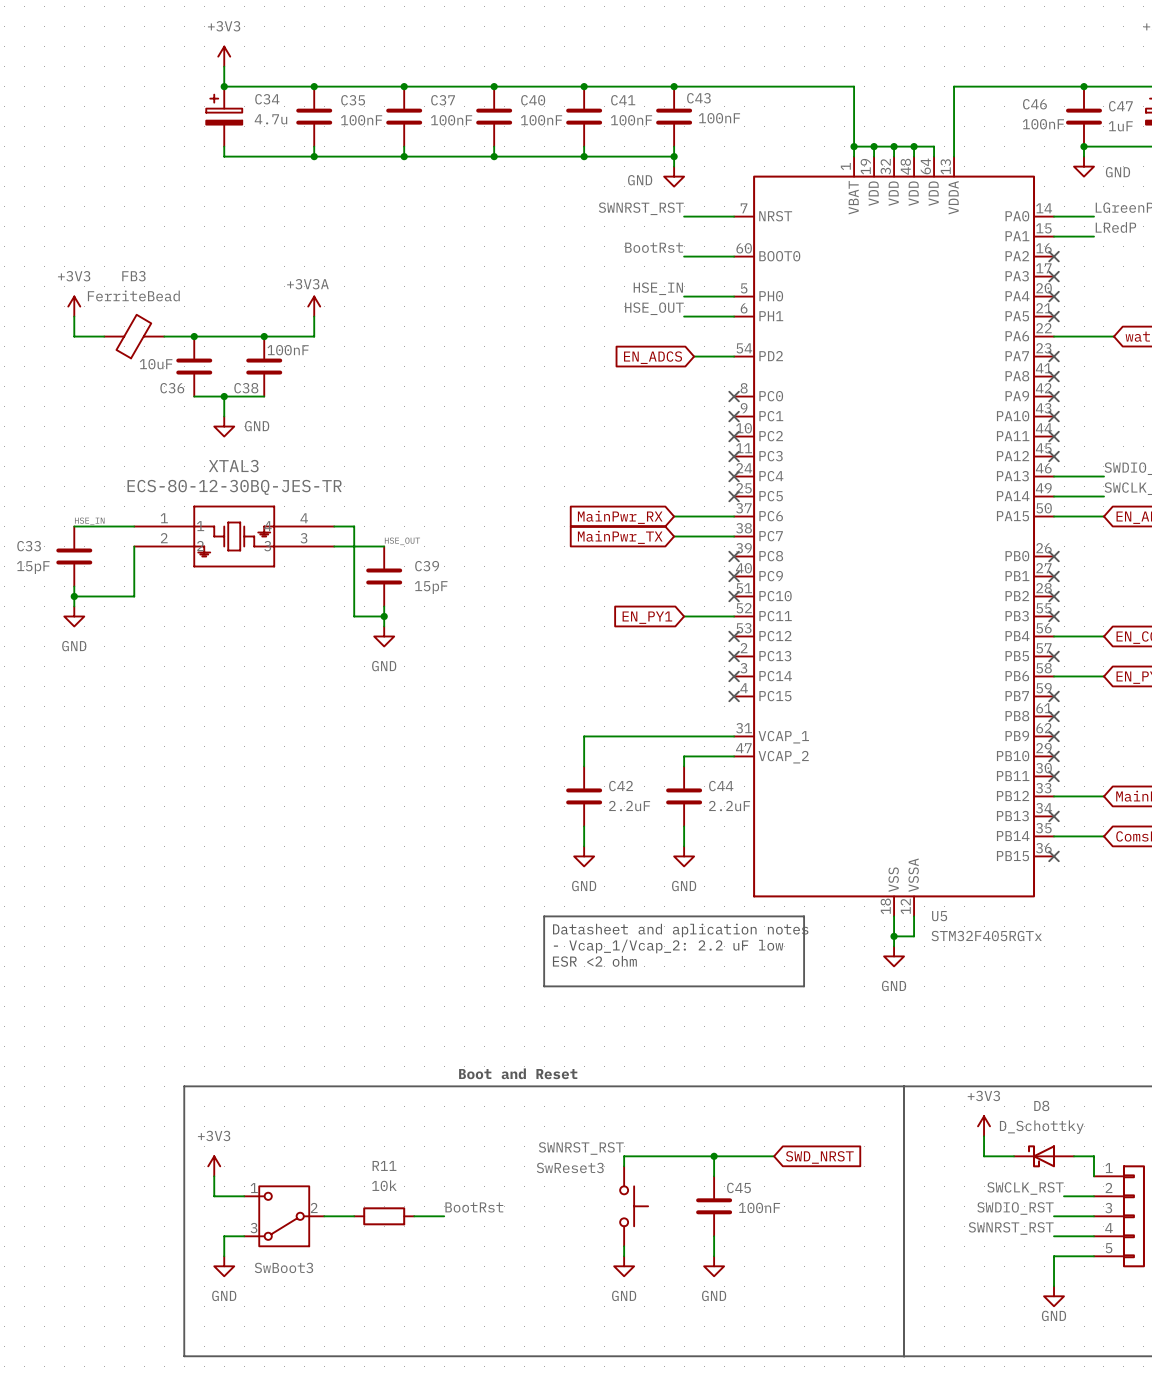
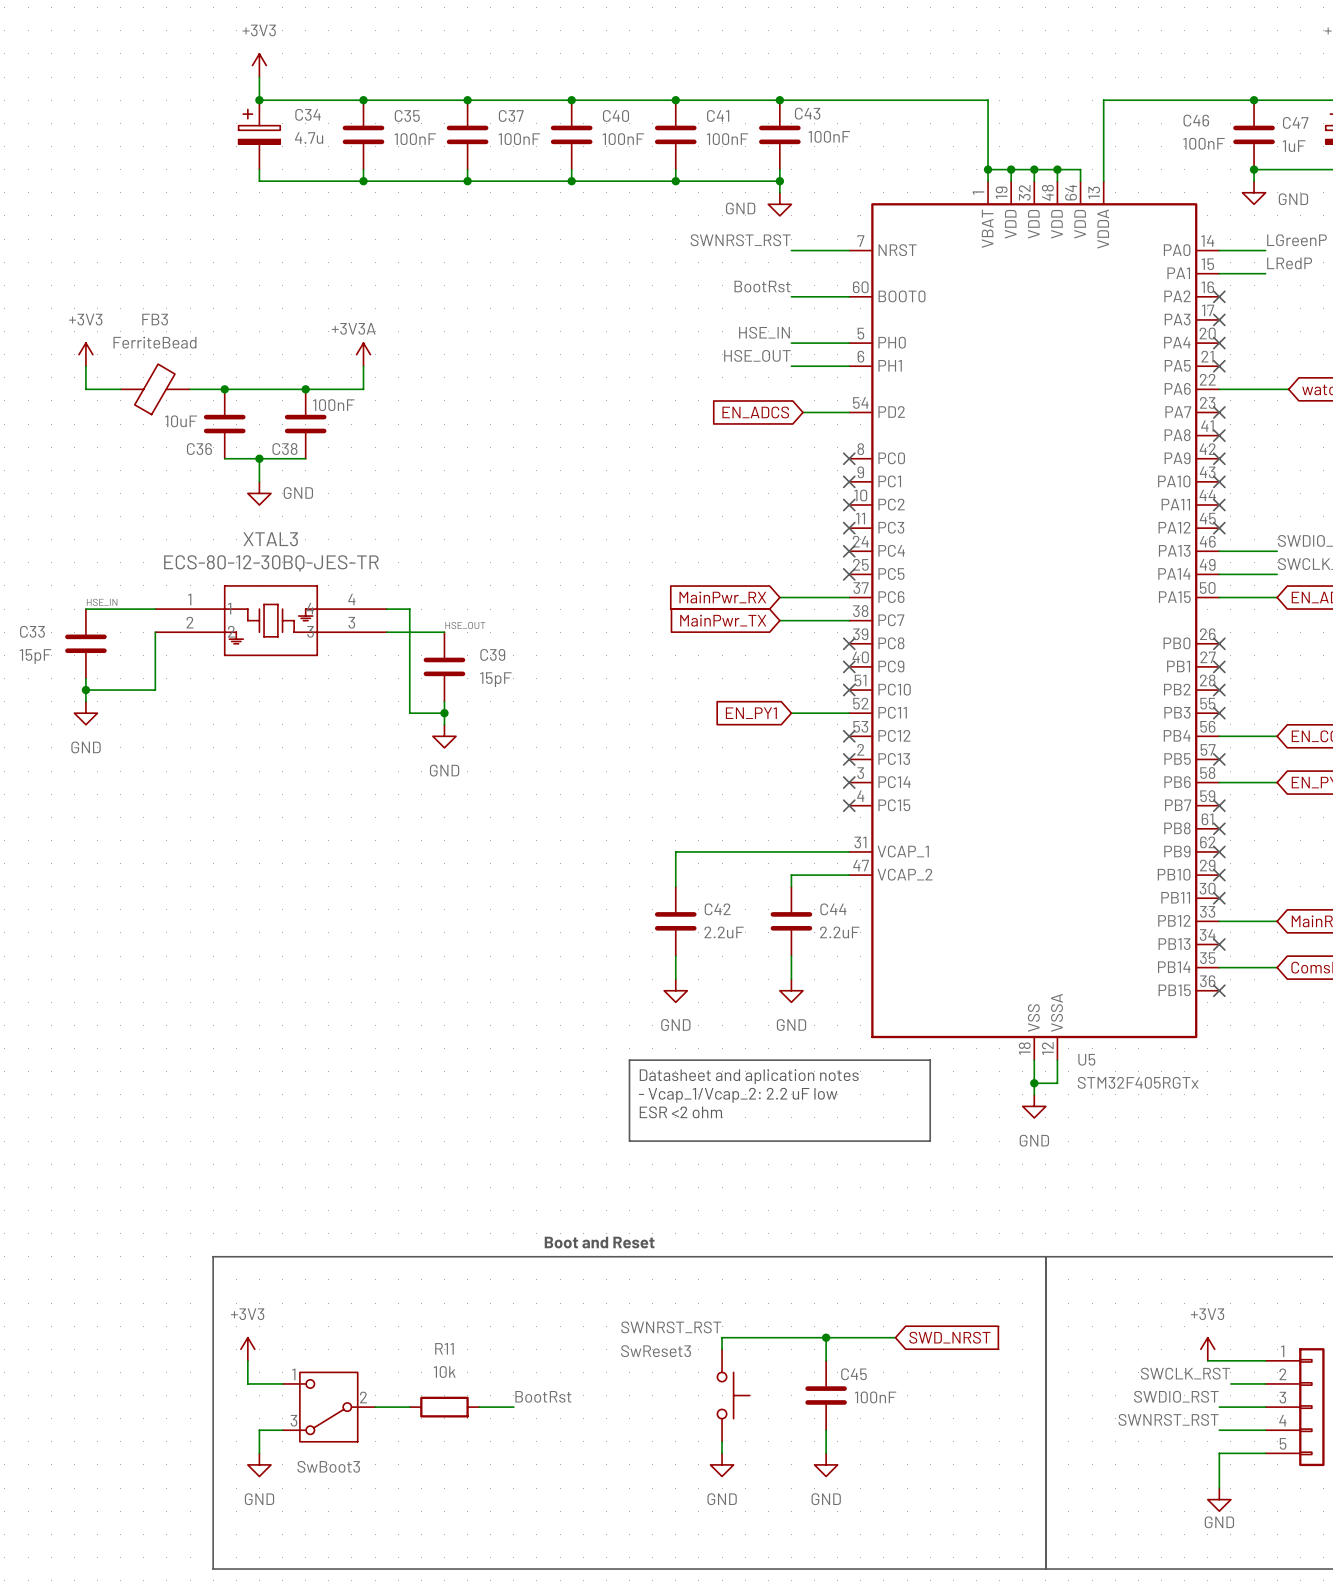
power symbol position: +3V3 (984, 1126) -> +3V3 (1207, 1349)
wire: (984, 1136) (984, 1156) (1014, 1156) -> none
D8: D_Schottky (1044, 1156) -> none
wire: (1074, 1156) (1093, 1156) (1093, 1176) -> (1207, 1360) (1265, 1360)

